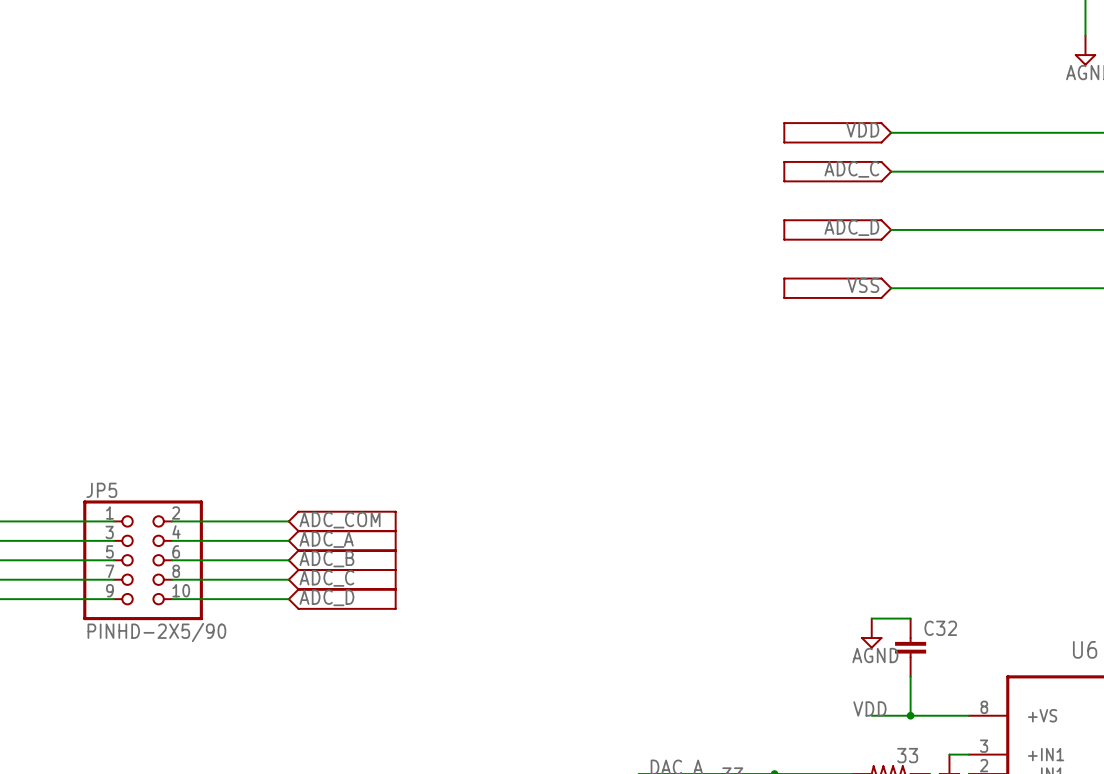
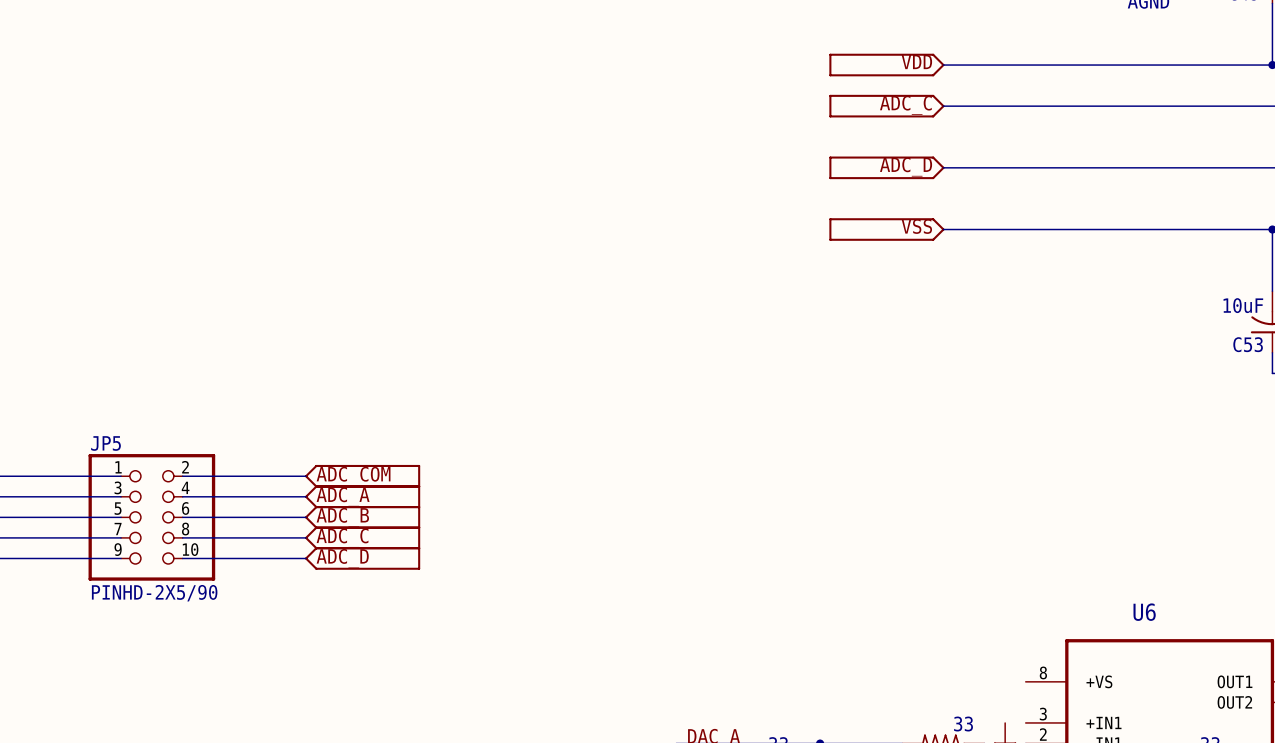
wire: (871, 618) (910, 618) -> none
power symbol: AGND (871, 633) -> none
C32: (910, 647) -> none
wire: (910, 676) (910, 715) -> none
label: VDD (869, 708) -> none
wire: (871, 715) (968, 715) -> none
junction: (910, 715) -> none
wire: (949, 754) (968, 754) -> none

